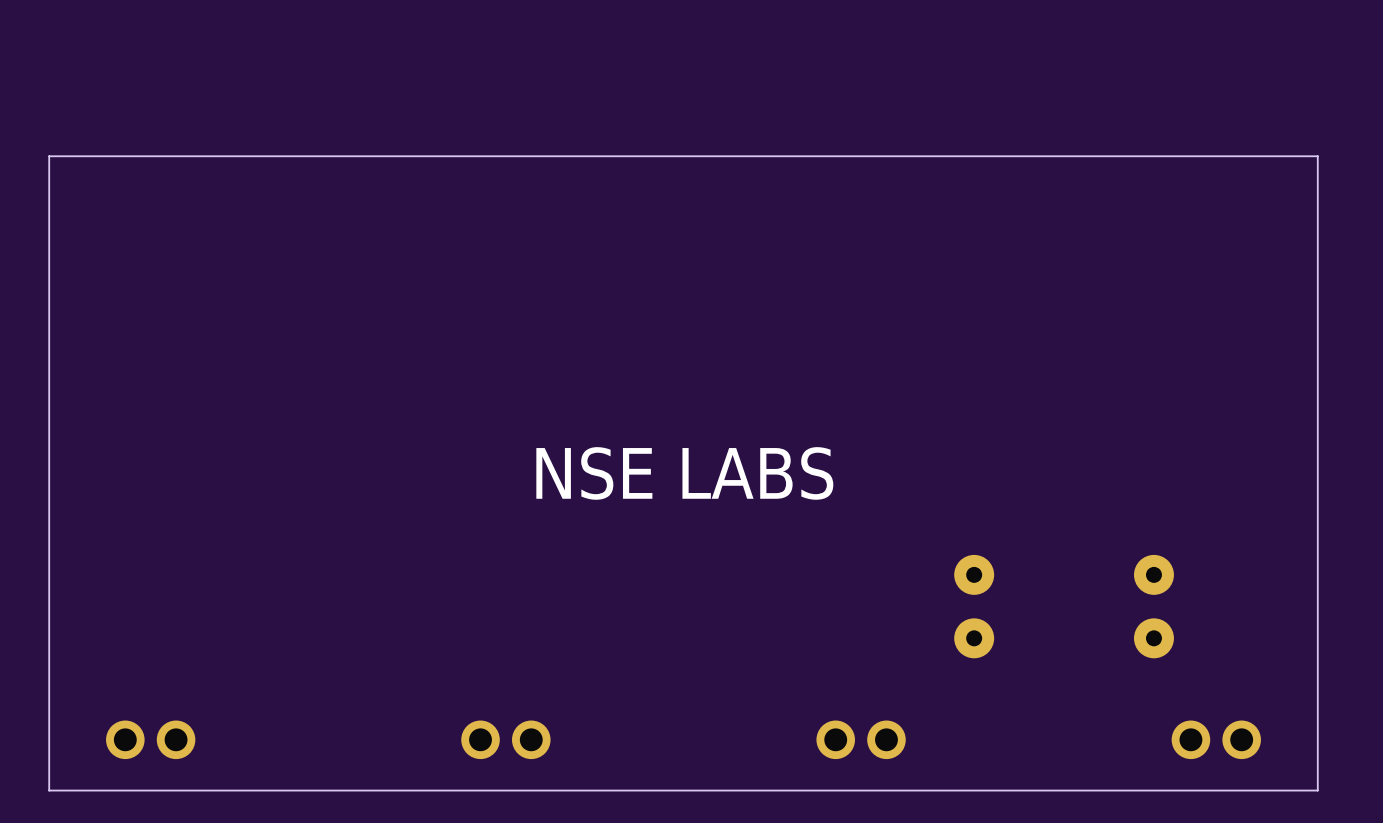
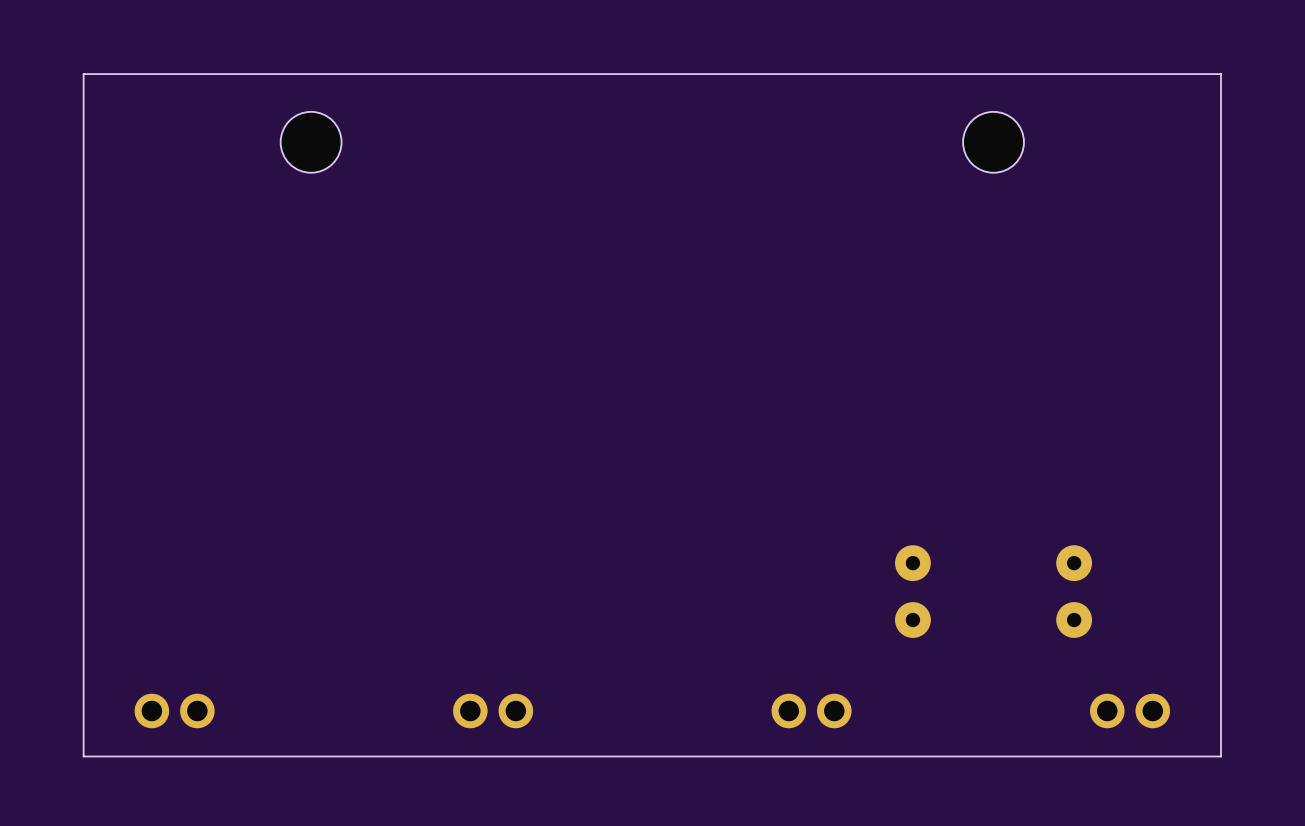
hole: none -> (311, 142)
hole: none -> (993, 142)
board edge: (1317, 156) (49, 156) -> (1221, 187) (1221, 74) (83, 74) (83, 187)
text: NSE LABS (684, 473) -> none

